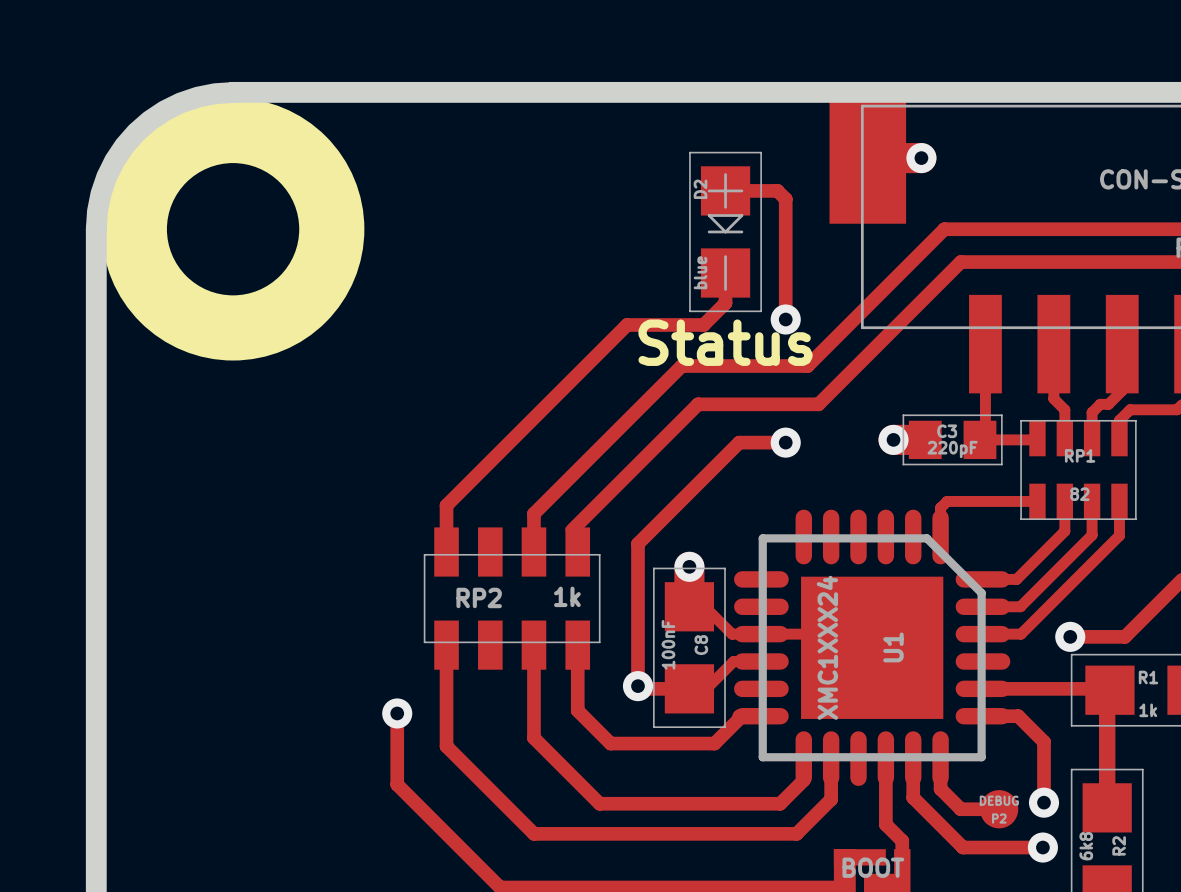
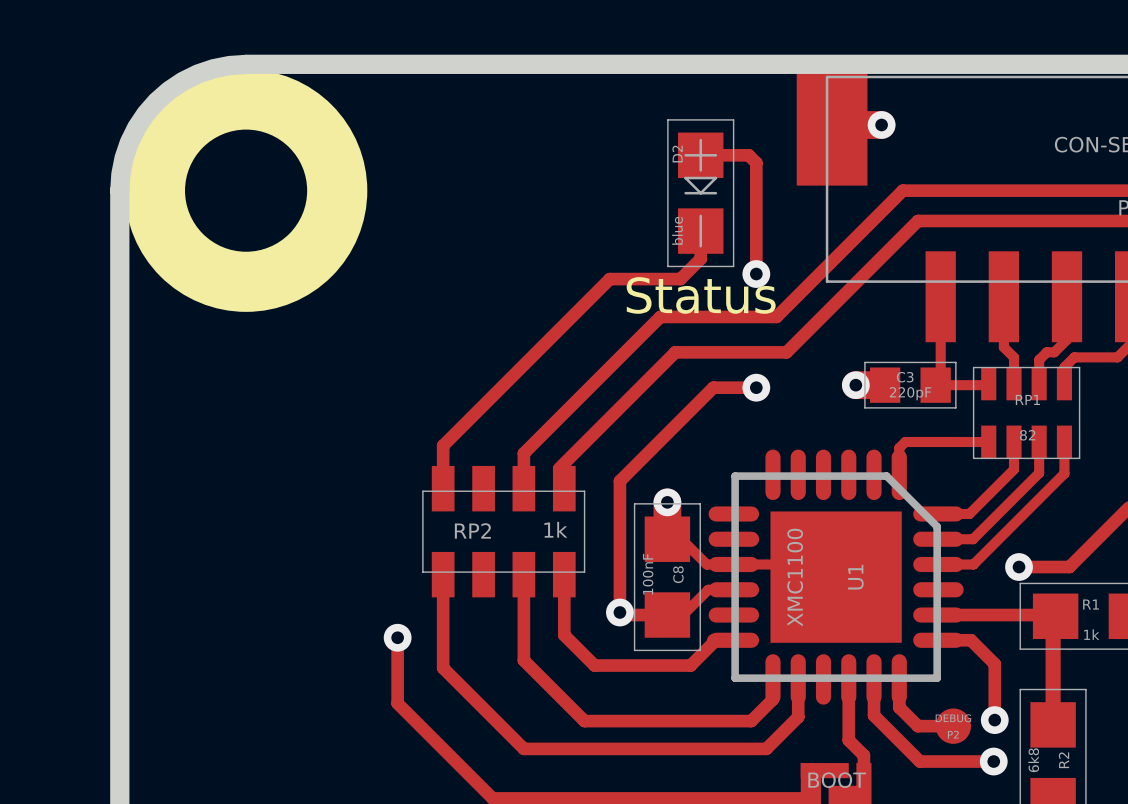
U1 value: XMC1XXX24 (827, 647) -> XMC1100 (795, 577)

